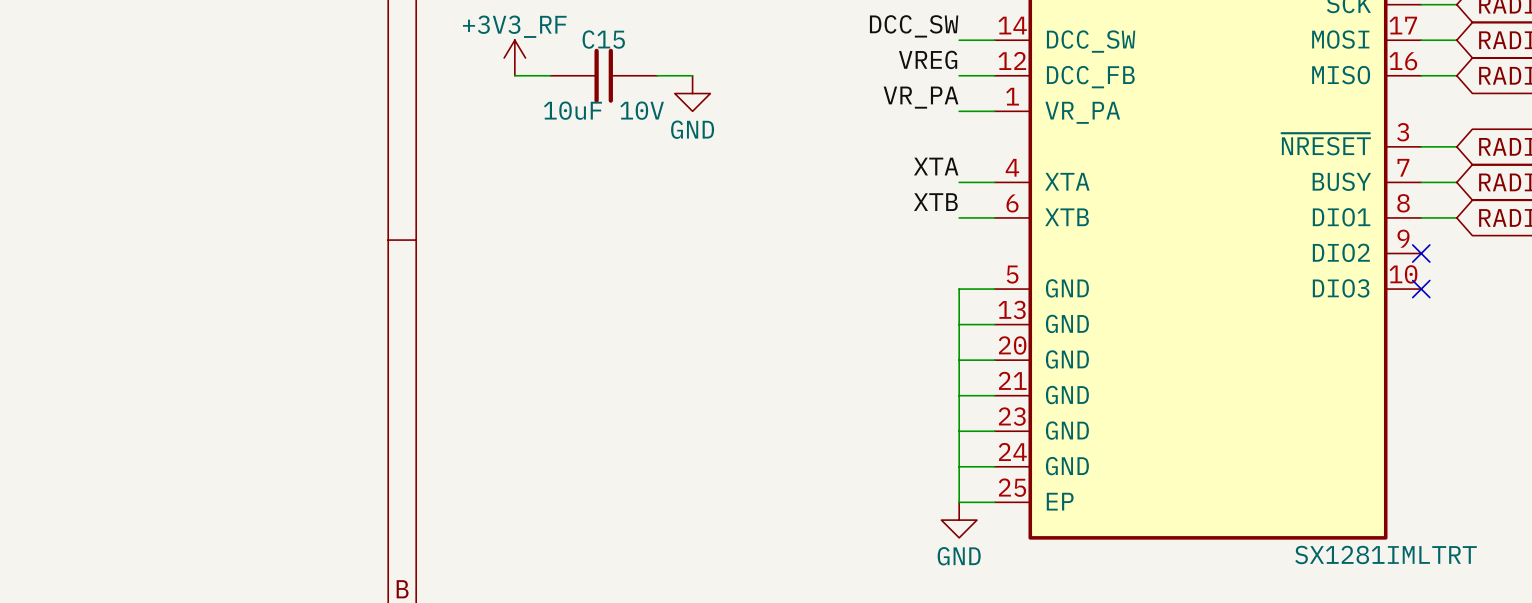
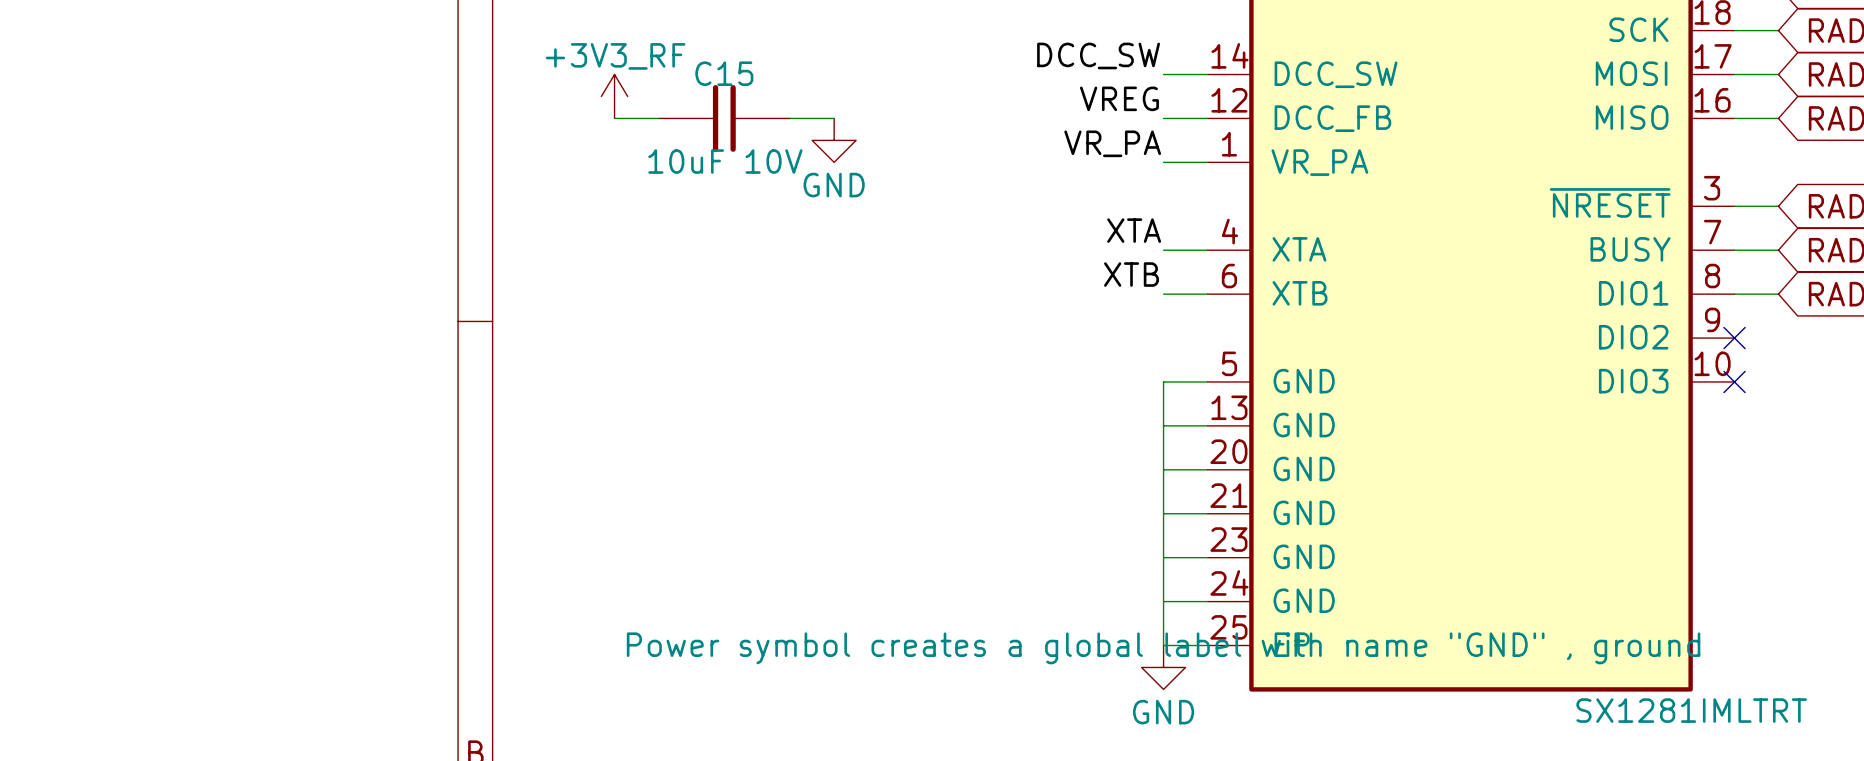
power symbol text: none -> Power symbol creates a global label with name "GND" , ground (1163, 648)

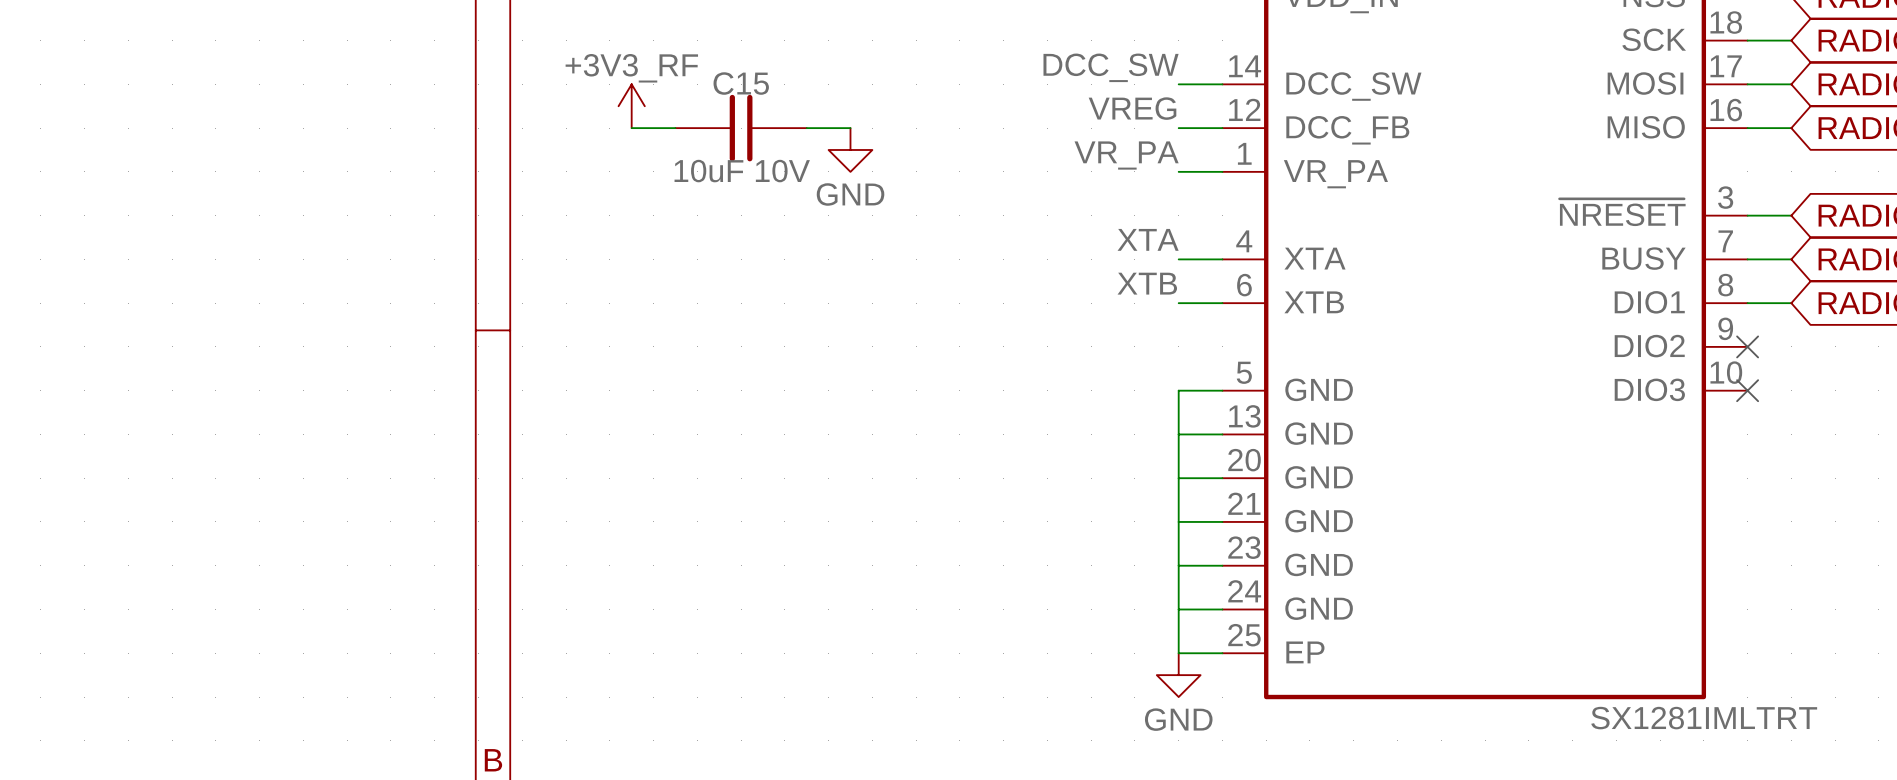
power symbol text: Power symbol creates a global label with name "GND" , ground (1163, 648) -> none

